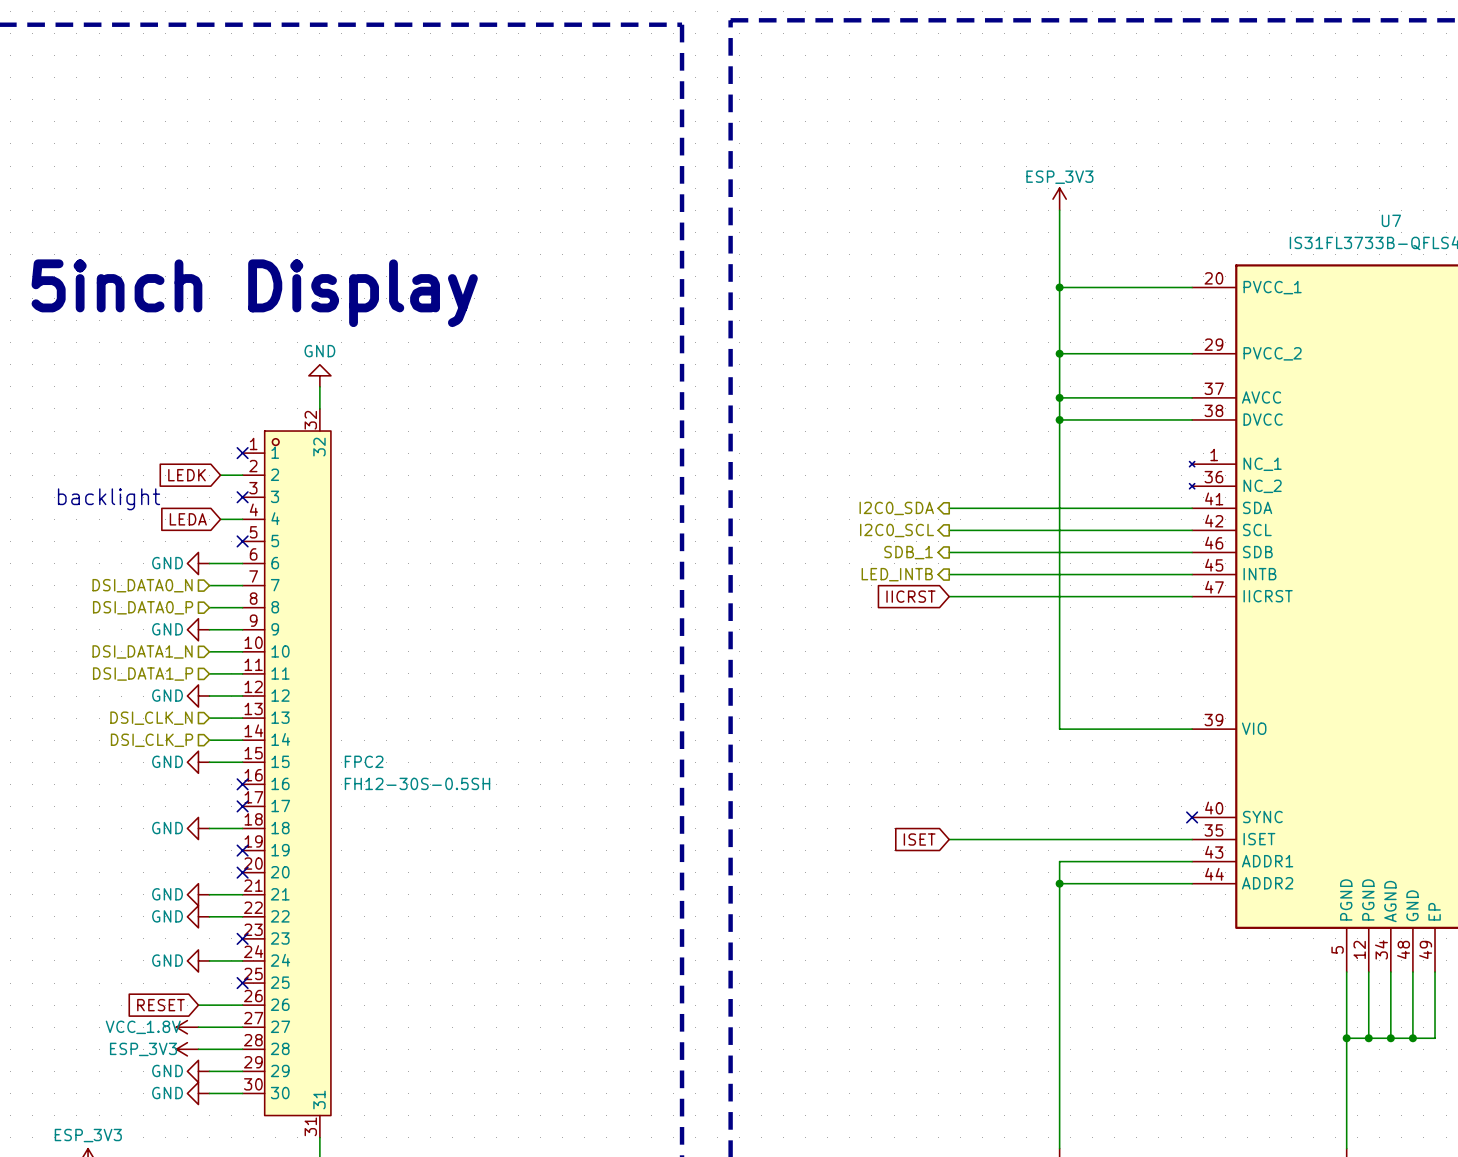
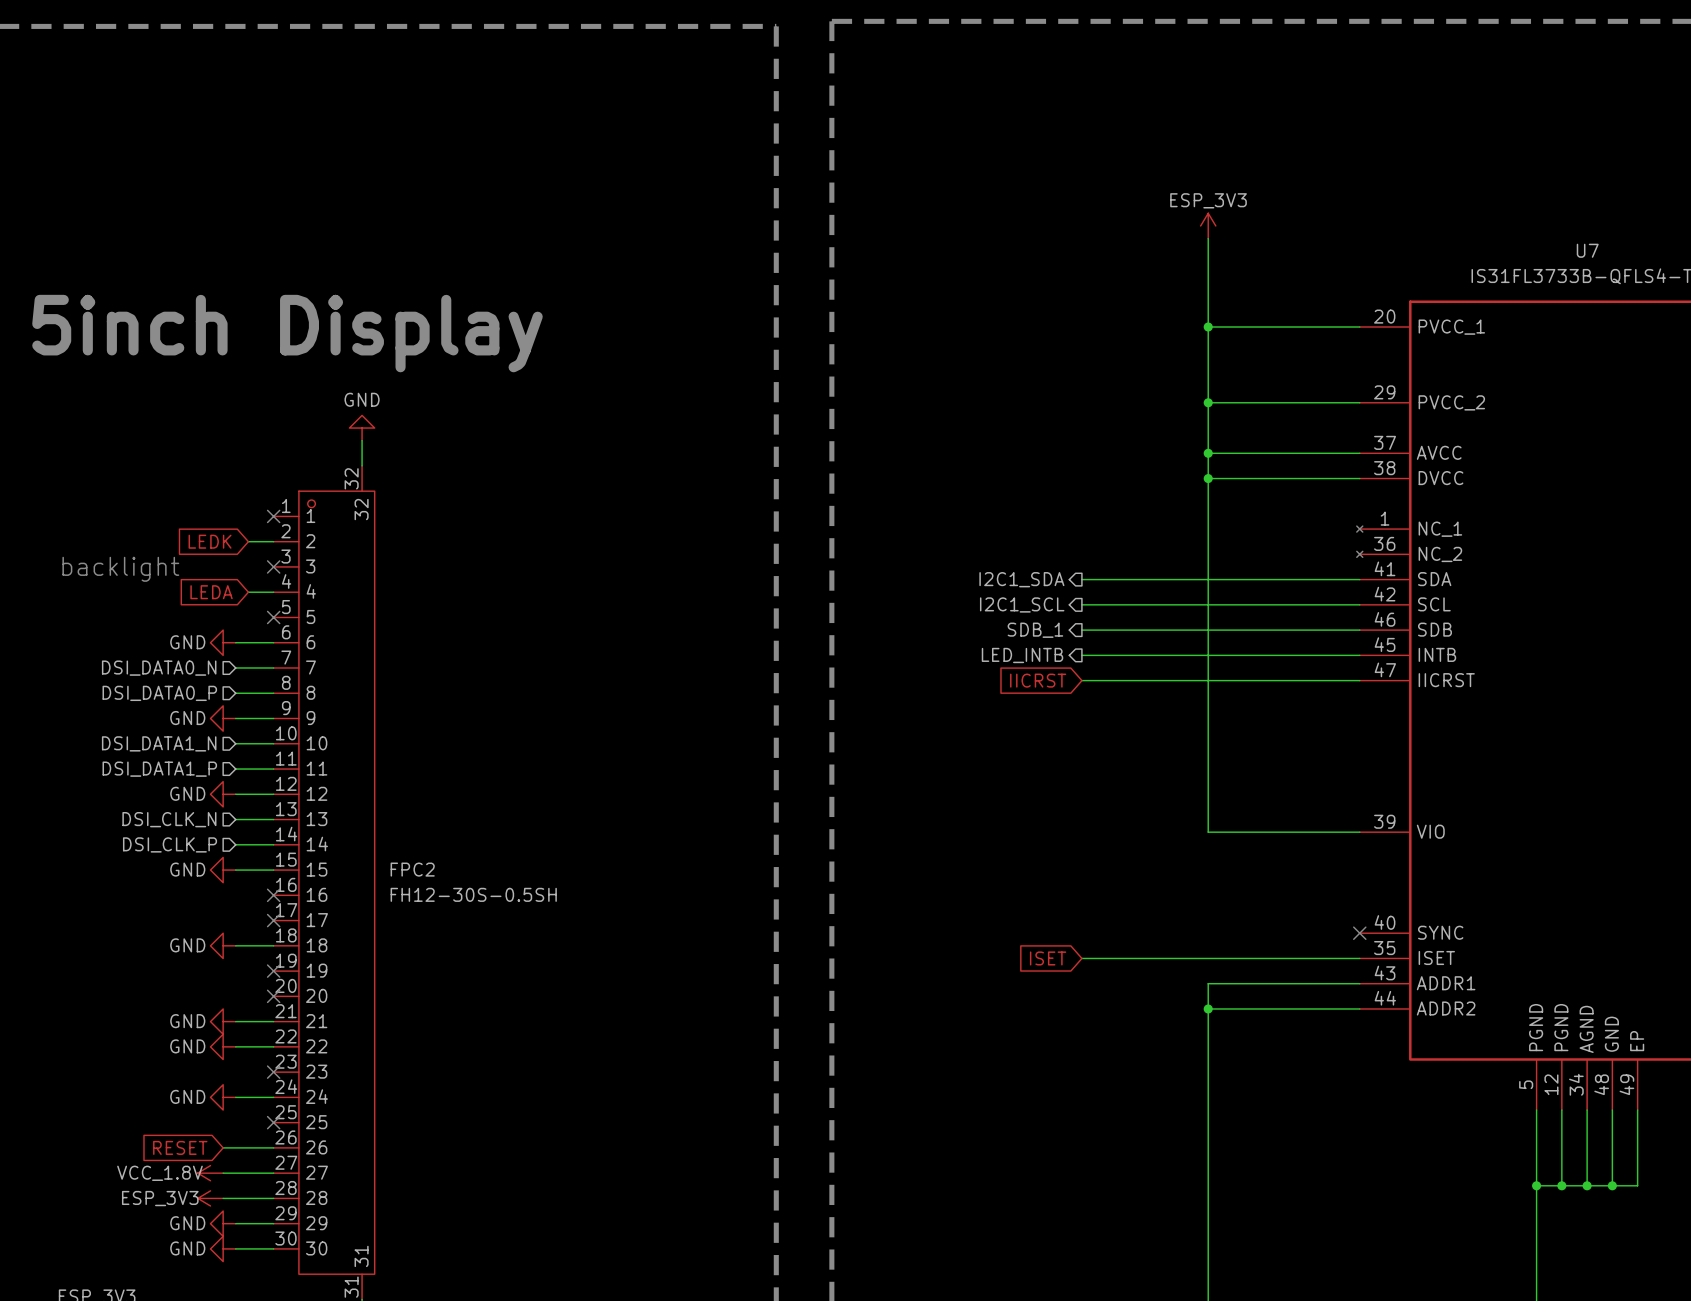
hierarchical label: I2C0_SDA (896, 508) -> I2C1_SDA (1021, 579)
hierarchical label: I2C0_SCL (896, 530) -> I2C1_SCL (1022, 604)

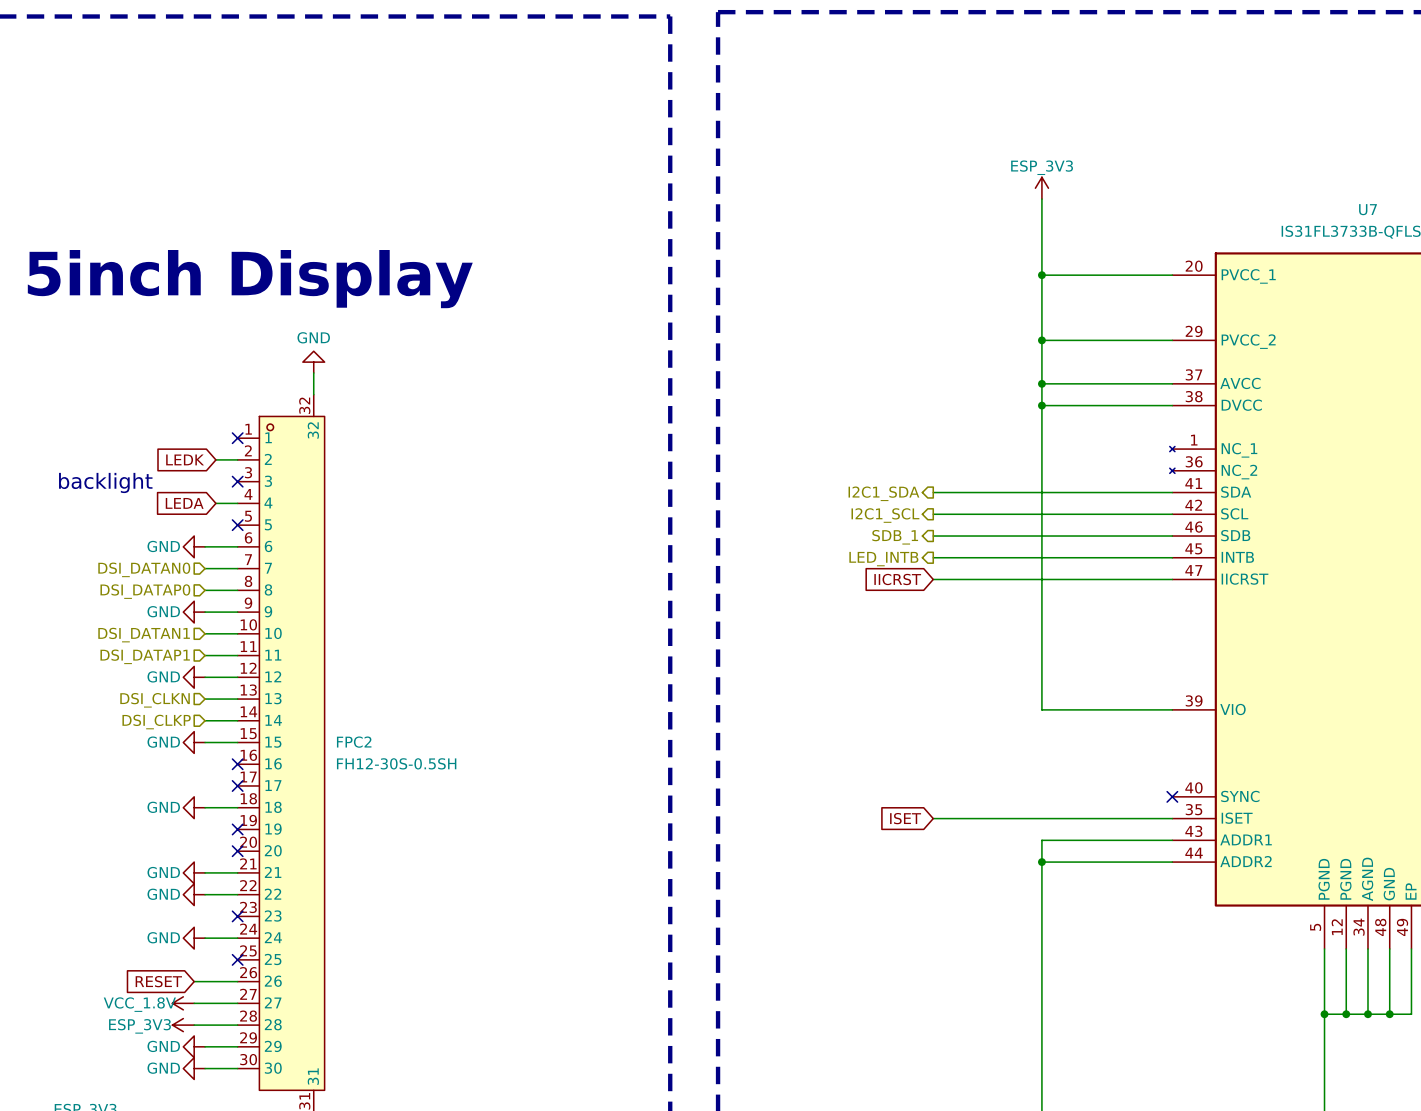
hierarchical label: DSI_DATA0_N (159, 668) -> DSI_DATAN0 (144, 569)
hierarchical label: DSI_DATA0_P (159, 693) -> DSI_DATAP0 (145, 591)
hierarchical label: DSI_DATA1_N (159, 743) -> DSI_DATAN1 (144, 635)
hierarchical label: DSI_DATA1_P (159, 769) -> DSI_DATAP1 (145, 656)
hierarchical label: DSI_CLK_N (169, 819) -> DSI_CLKN (155, 700)
hierarchical label: DSI_CLK_P (170, 844) -> DSI_CLKP (156, 722)

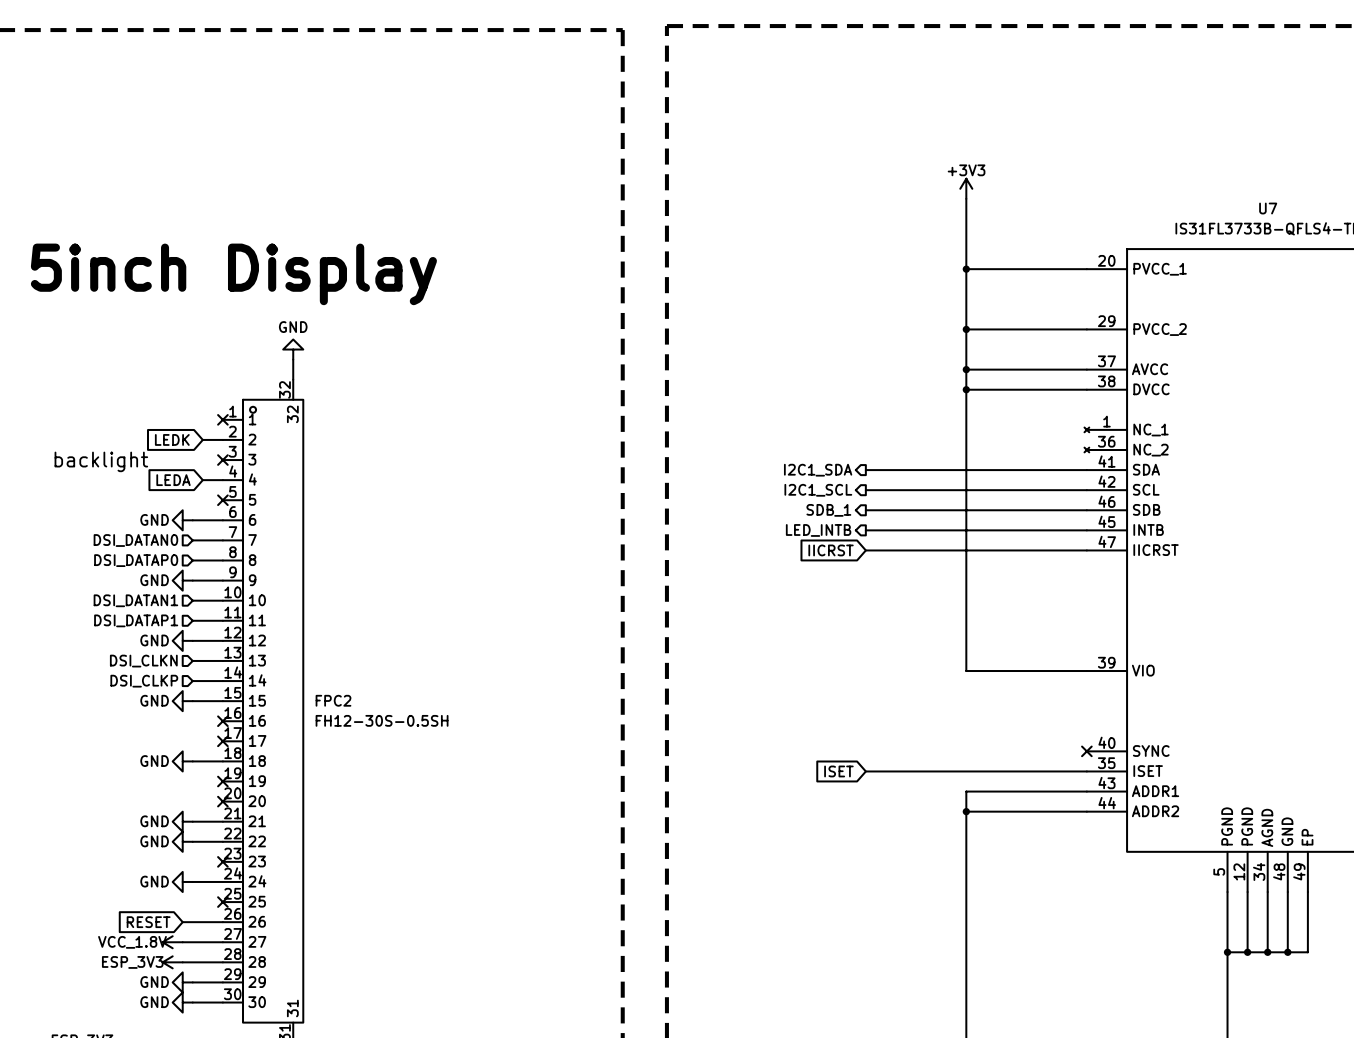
power symbol: ESP_3V3 (1041, 188) -> +3V3 (966, 188)

